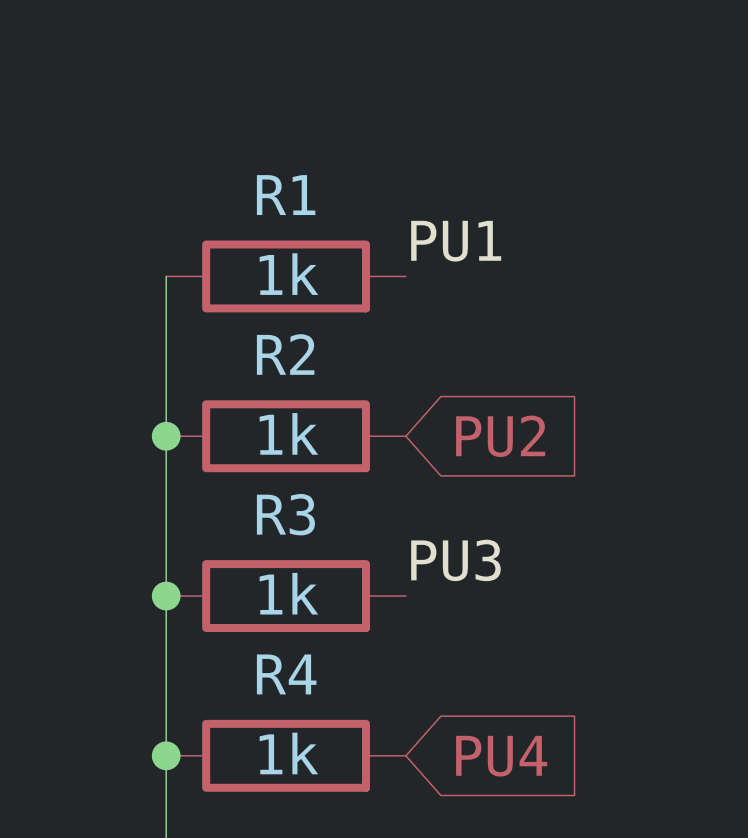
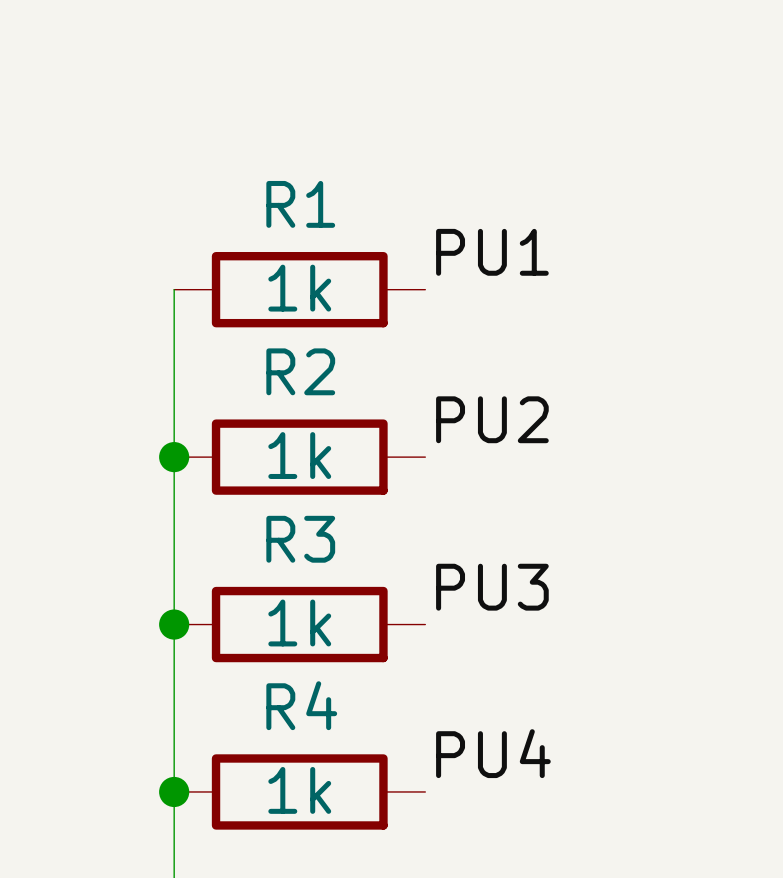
label: none -> PU2 (492, 419)
global label: PU2 (500, 436) -> none
label: none -> PU4 (493, 753)
global label: PU4 (501, 756) -> none

